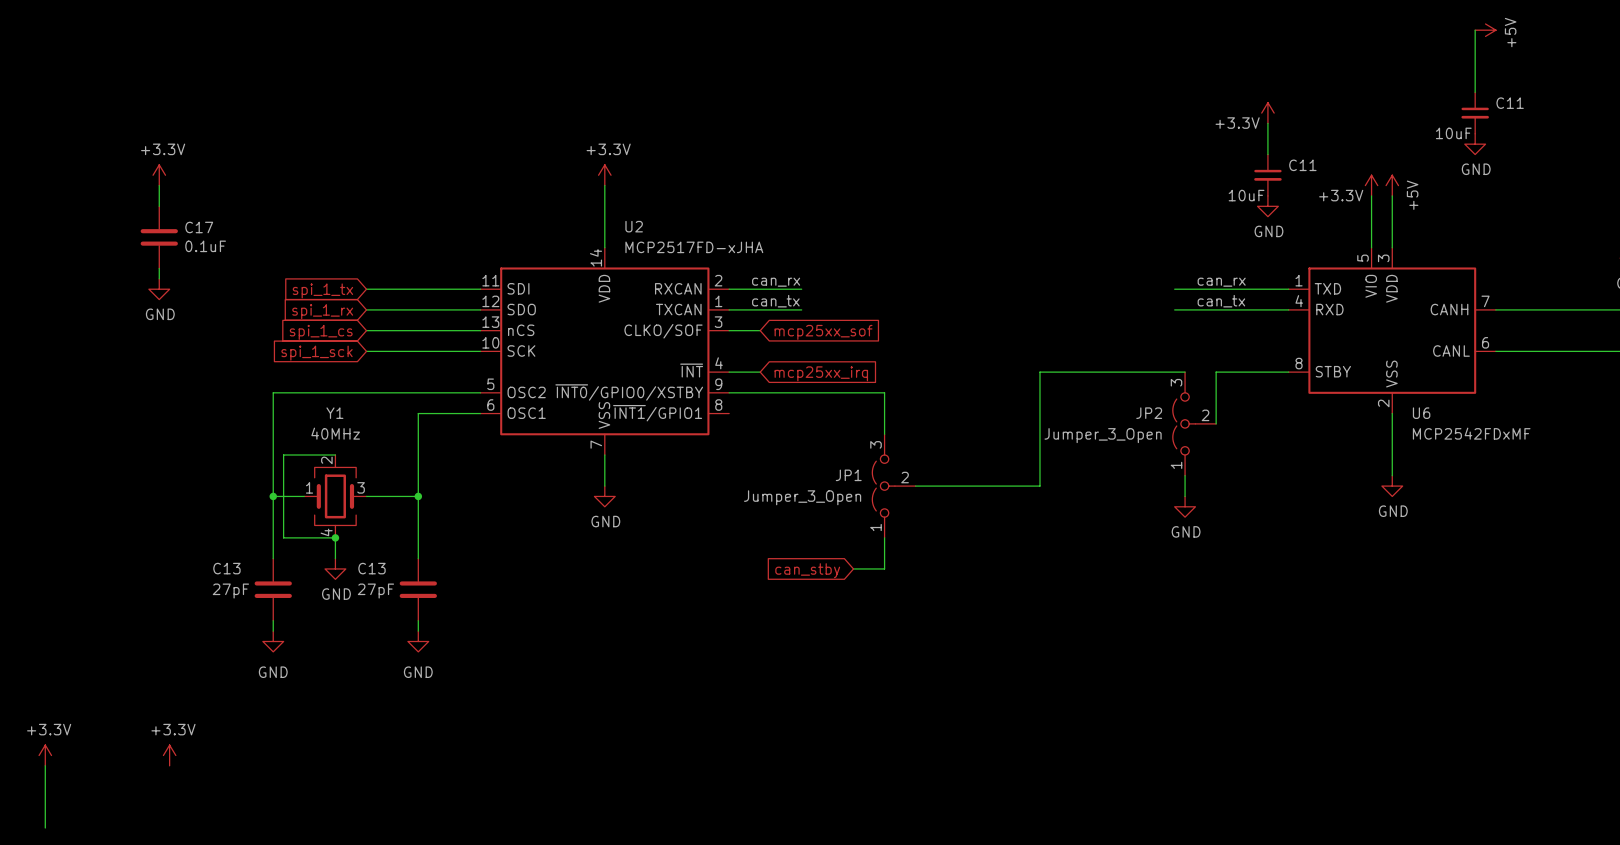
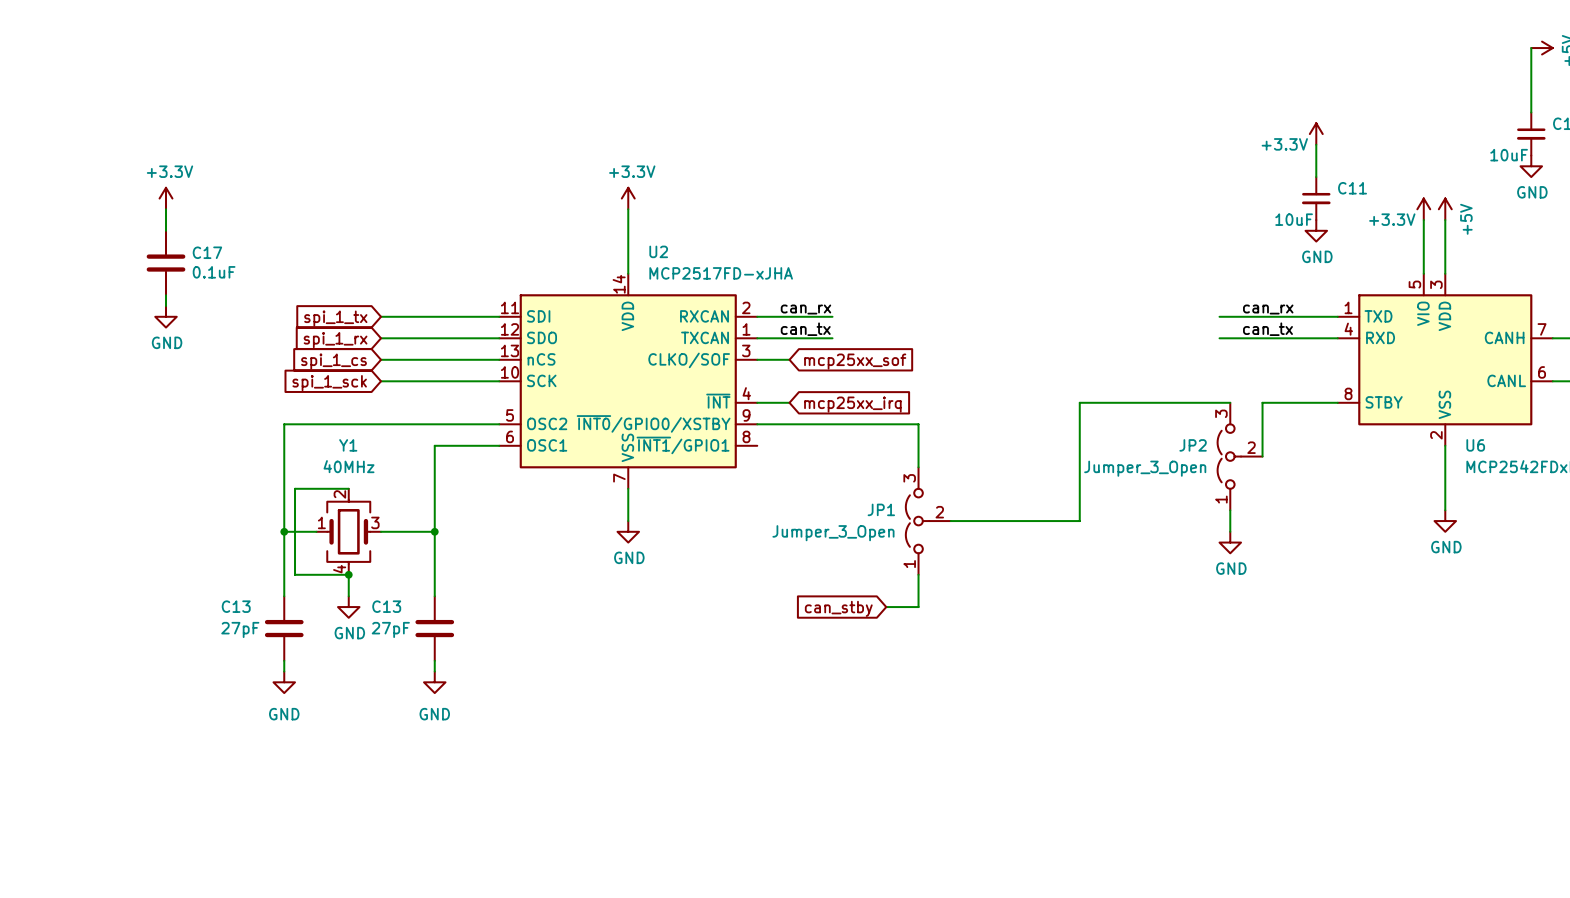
power symbol: +3.3V (45, 755) -> none
power symbol: +3.3V (169, 755) -> none
wire: (45, 765) (45, 828) -> none

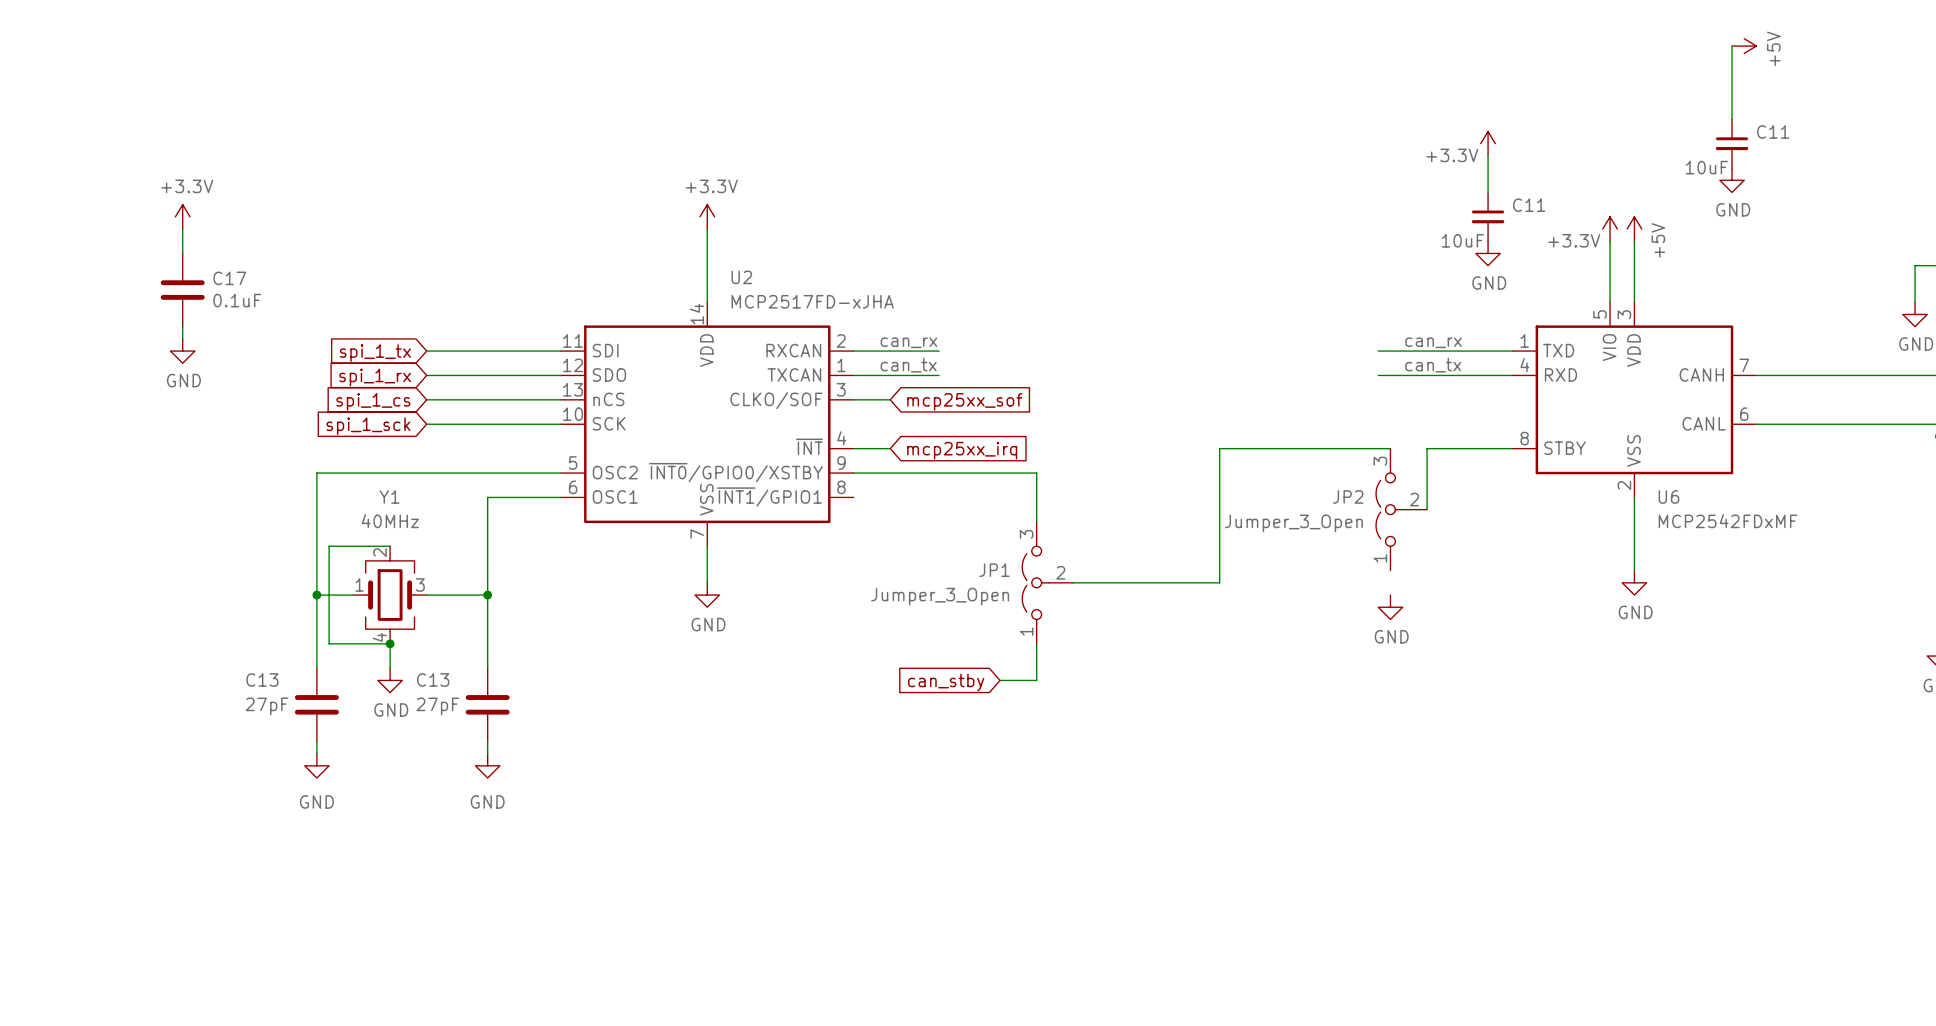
wire: (1230, 510) (1230, 531) -> none

